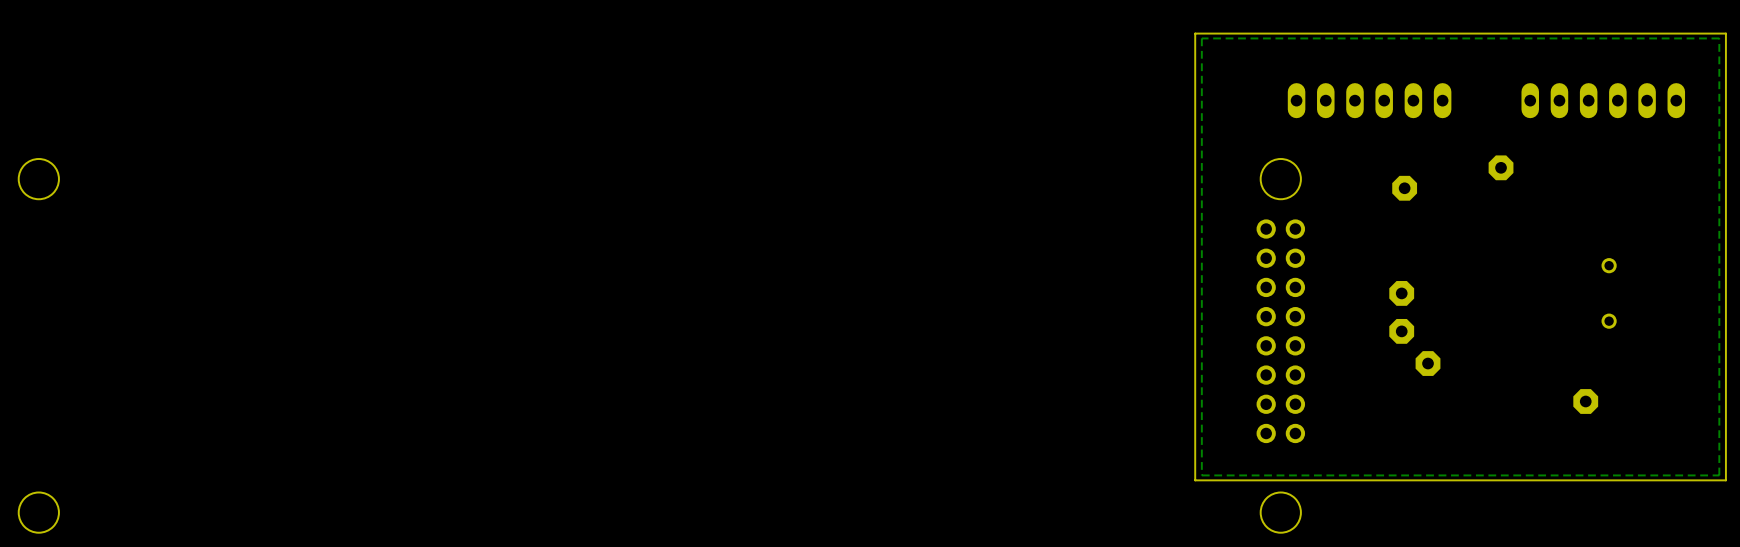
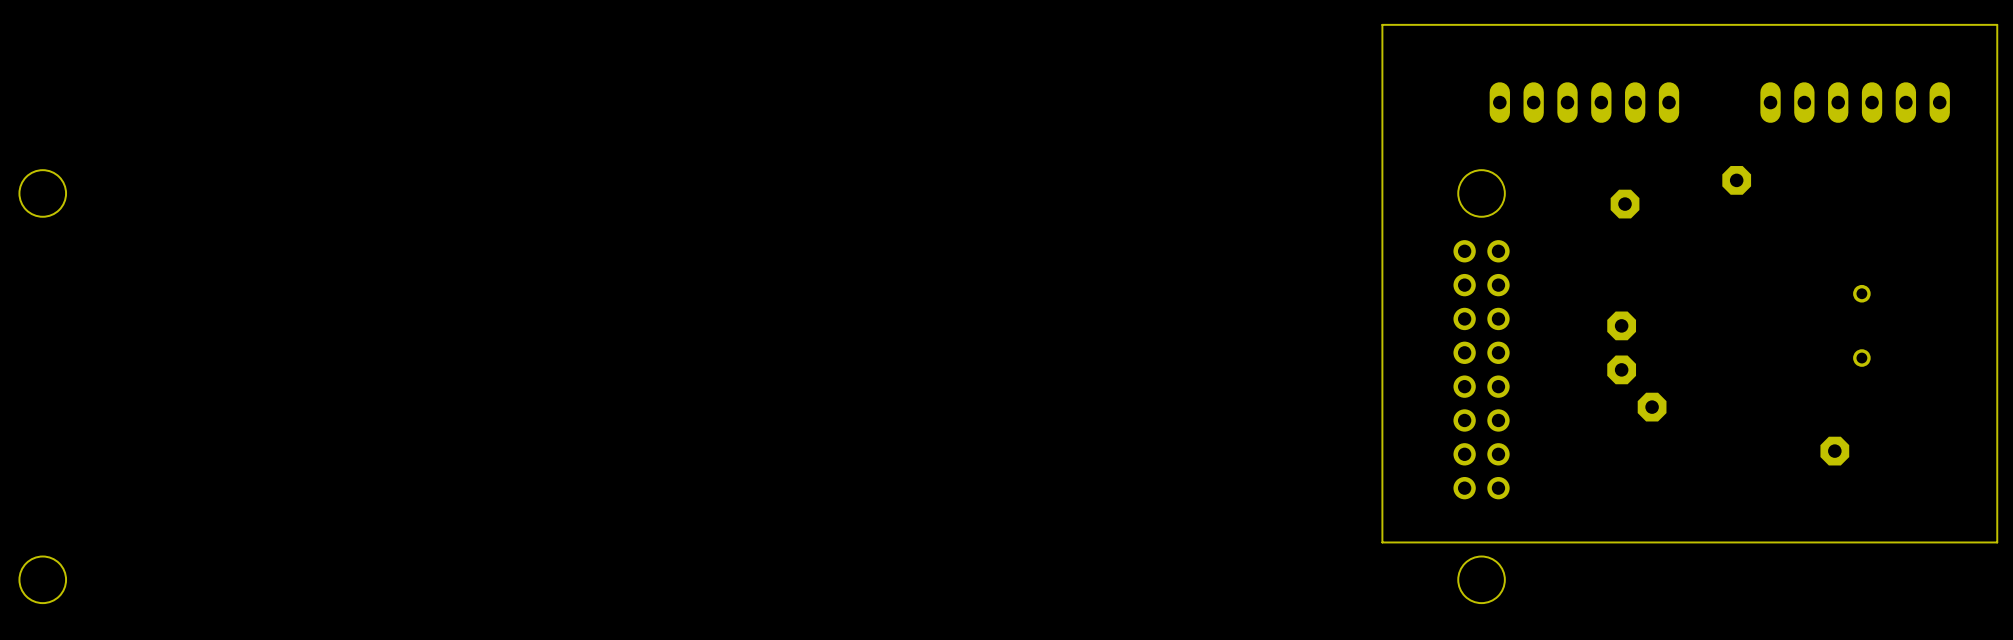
zone outline: (1719, 38) (1201, 38) (1201, 475) (1719, 475) (1719, 38) -> none

